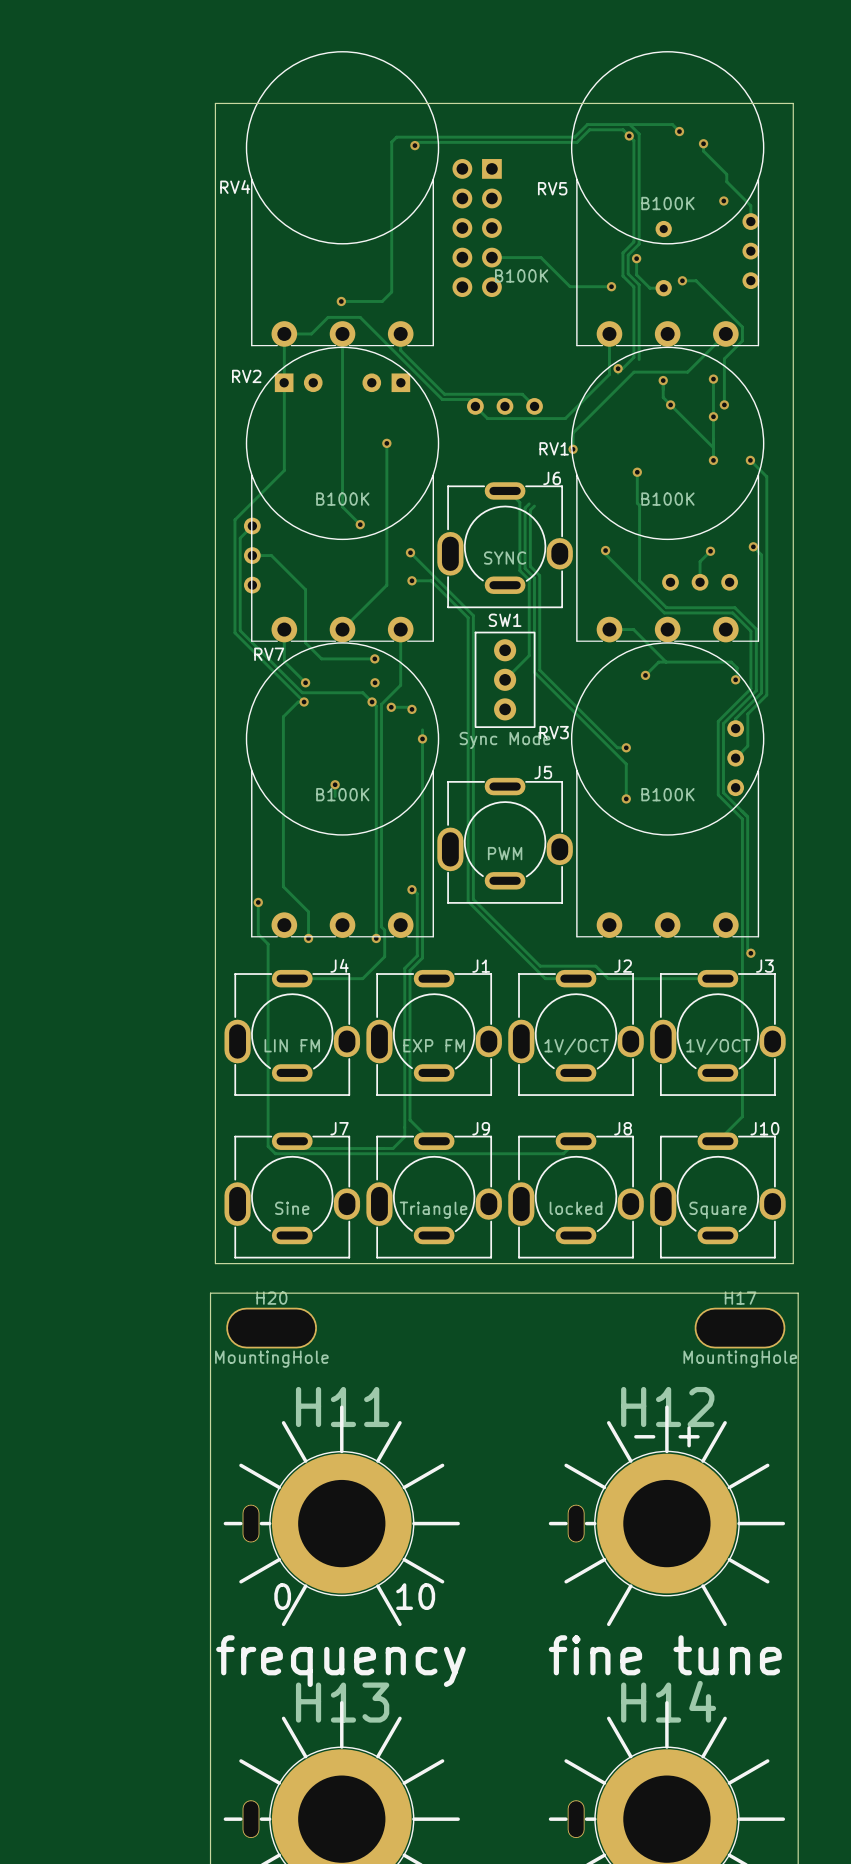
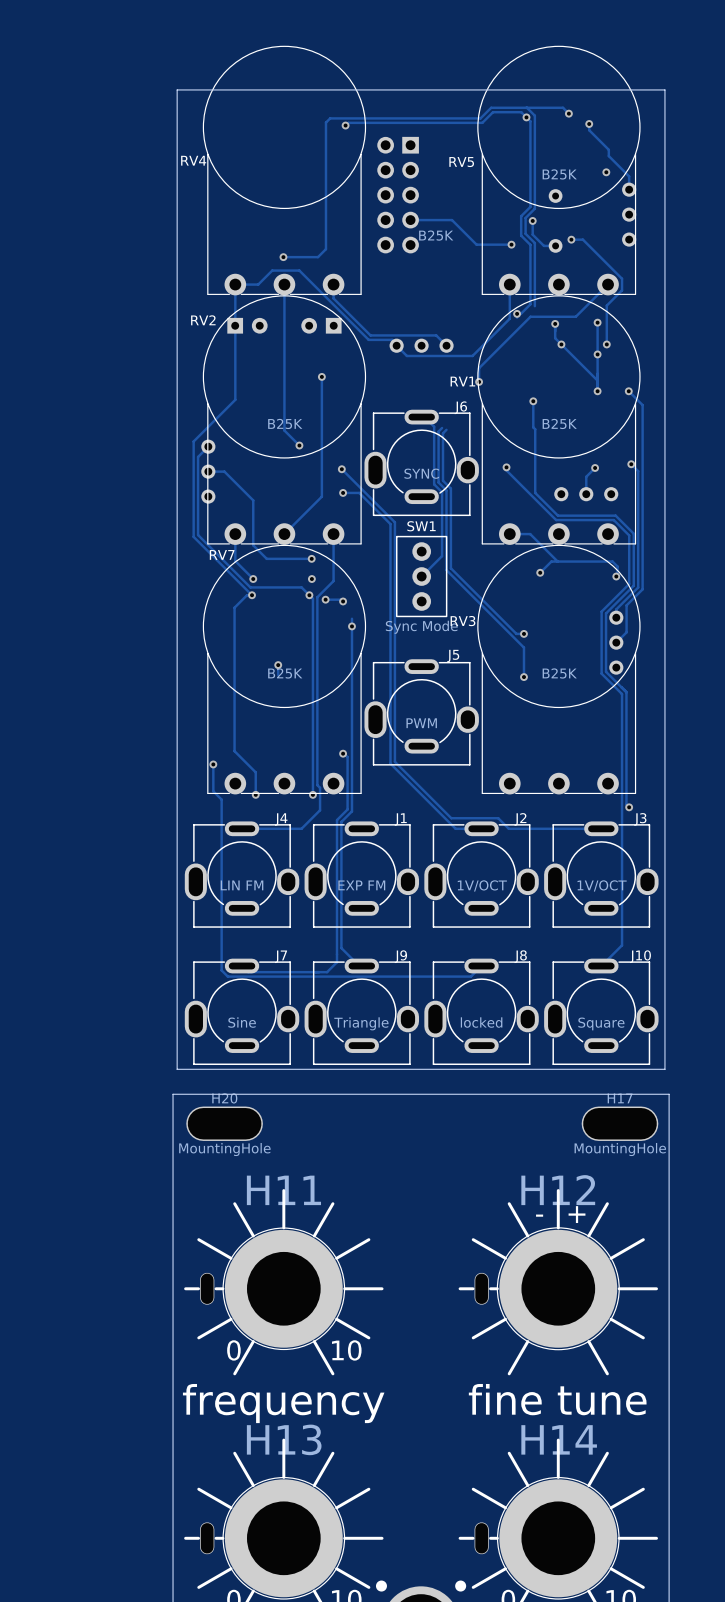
RV5 value: B100K (667, 203) -> B25K (559, 174)
RV4 value: B100K (521, 275) -> B25K (436, 235)
RV2 value: B100K (342, 499) -> B25K (285, 423)
RV1 value: B100K (667, 499) -> B25K (559, 423)
RV7 value: B100K (342, 794) -> B25K (285, 673)
RV3 value: B100K (667, 794) -> B25K (559, 673)

